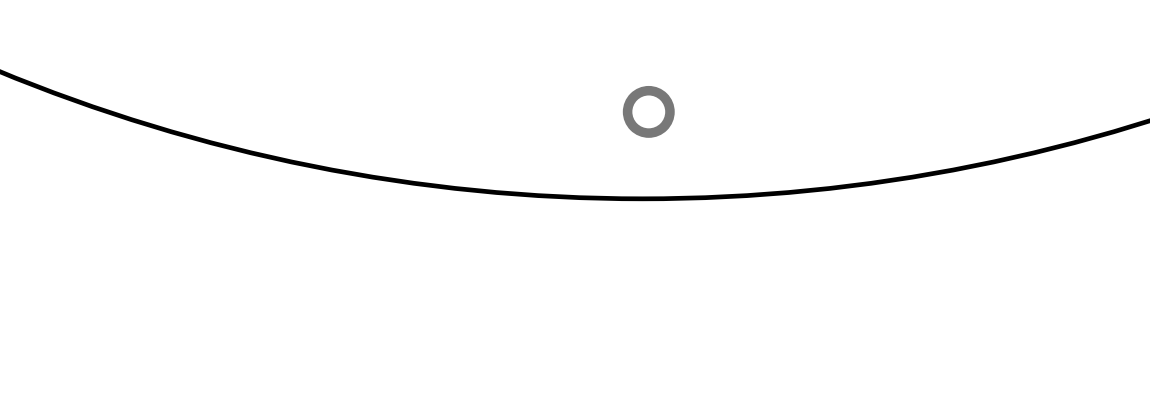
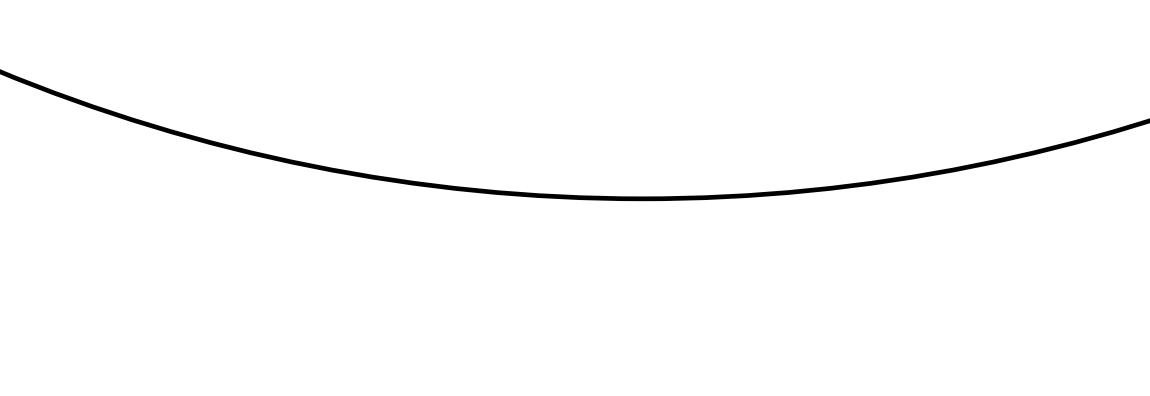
via: (648, 111) -> none

